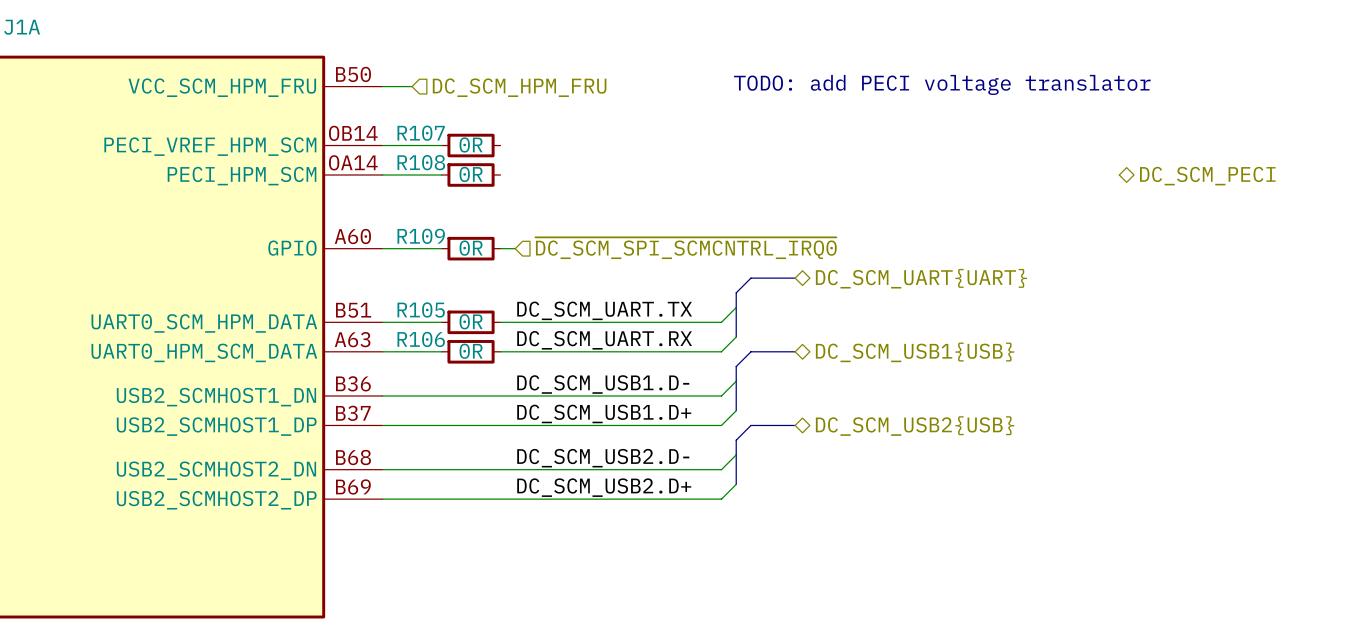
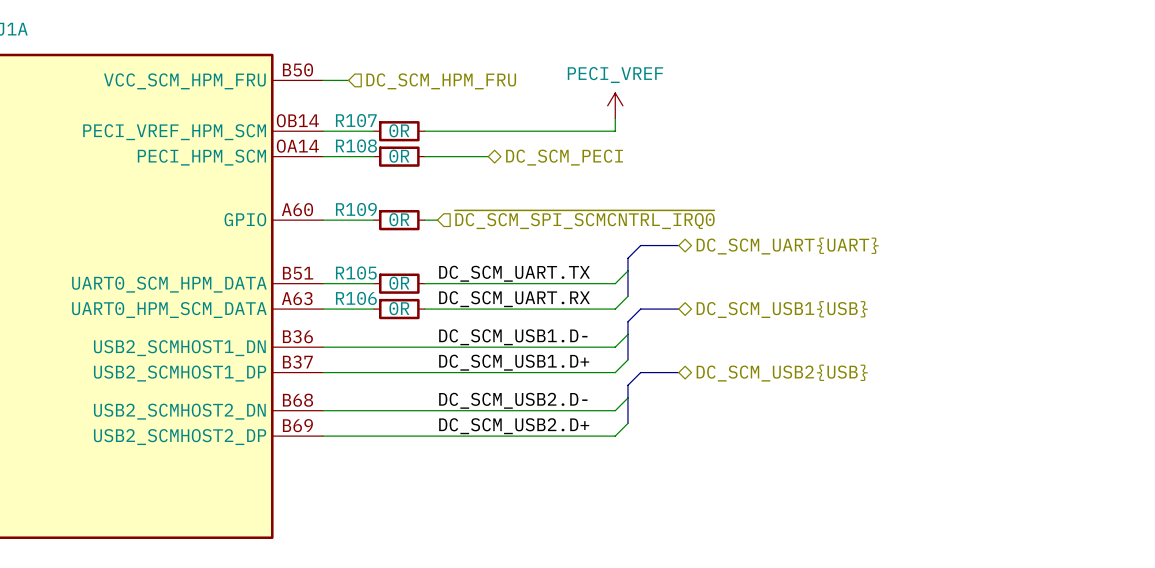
text: TODO: add PECI voltage translator (942, 84) -> none
power symbol: none -> PECI_VREF (615, 105)
wire: none -> (615, 118) (615, 131) (424, 131)
wire: none -> (424, 156) (488, 156)
hierarchical label: none -> DC_SCM_PECI (564, 157)
hierarchical label: DC_SCM_PECI (1207, 176) -> none

